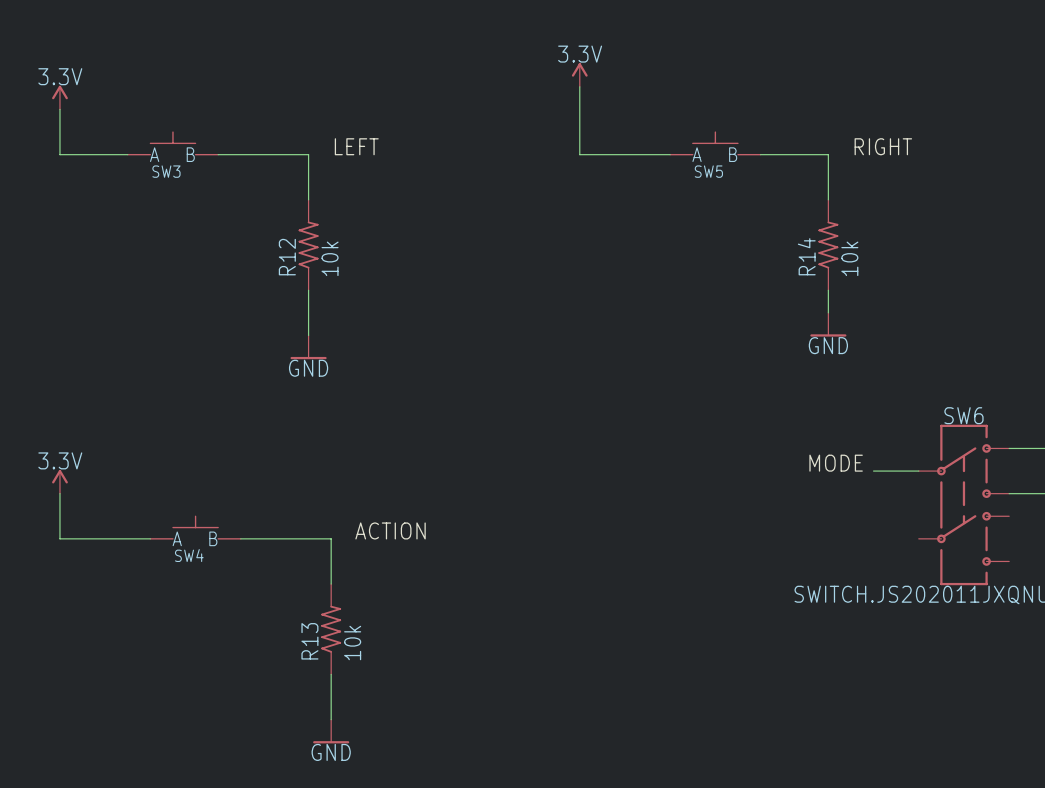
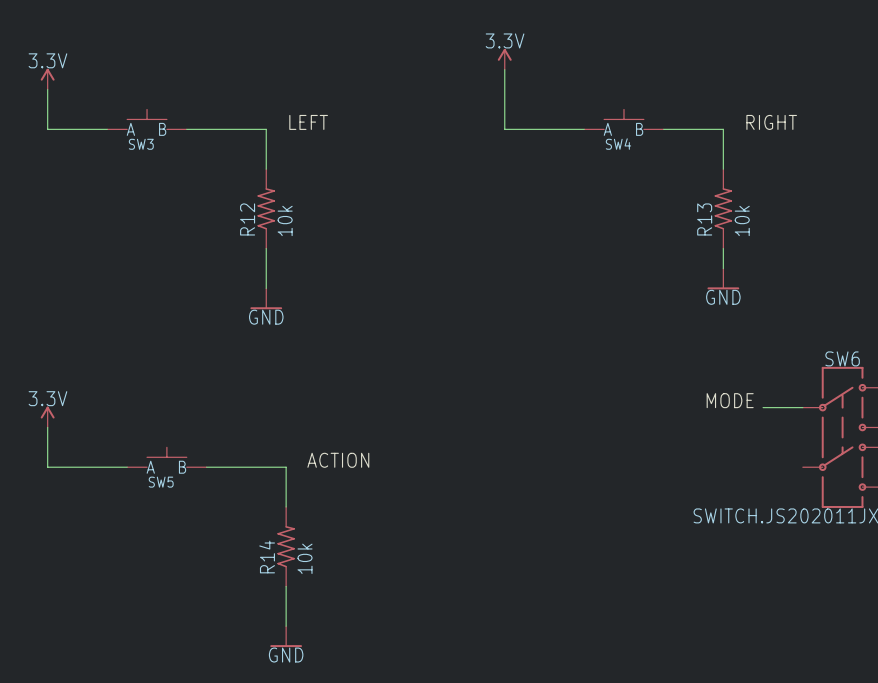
SW5 name: SW5 (708, 171) -> SW4 (618, 144)
R14 name: R14 (806, 256) -> R13 (704, 219)
SW4 name: SW4 (189, 555) -> SW5 (161, 482)
R13 name: R13 (309, 641) -> R14 (267, 557)

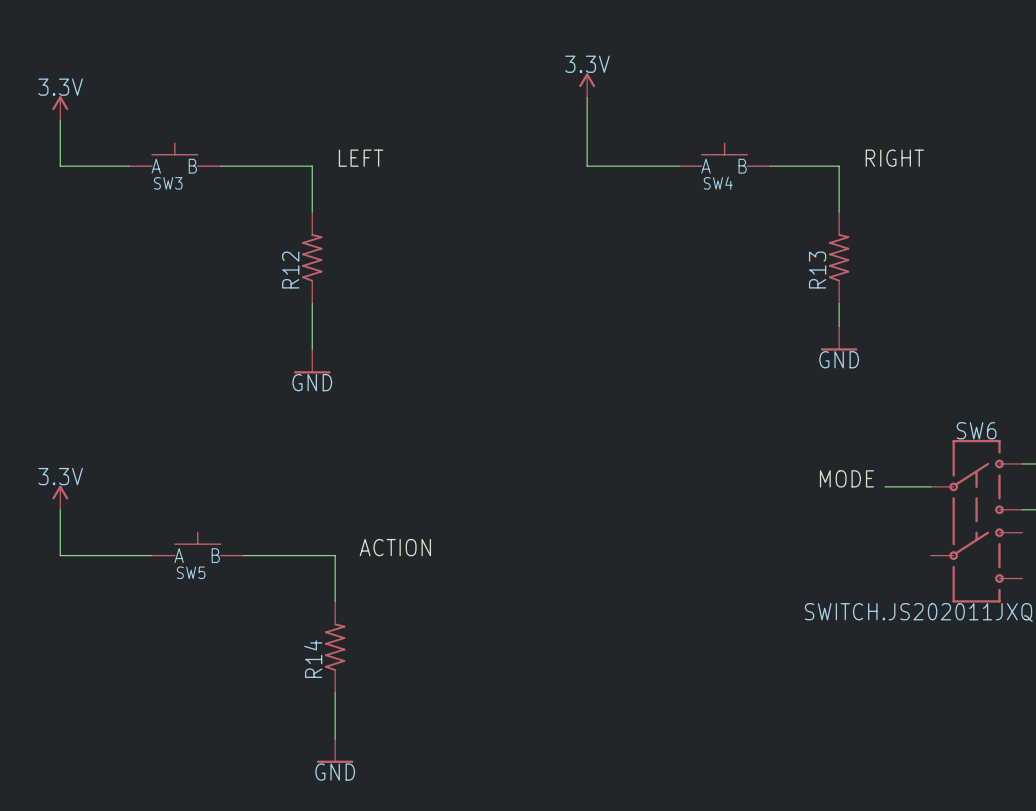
R12 value: 10k (285, 220) -> none
R13 value: 10k (742, 220) -> none
R14 value: 10k (305, 558) -> none

